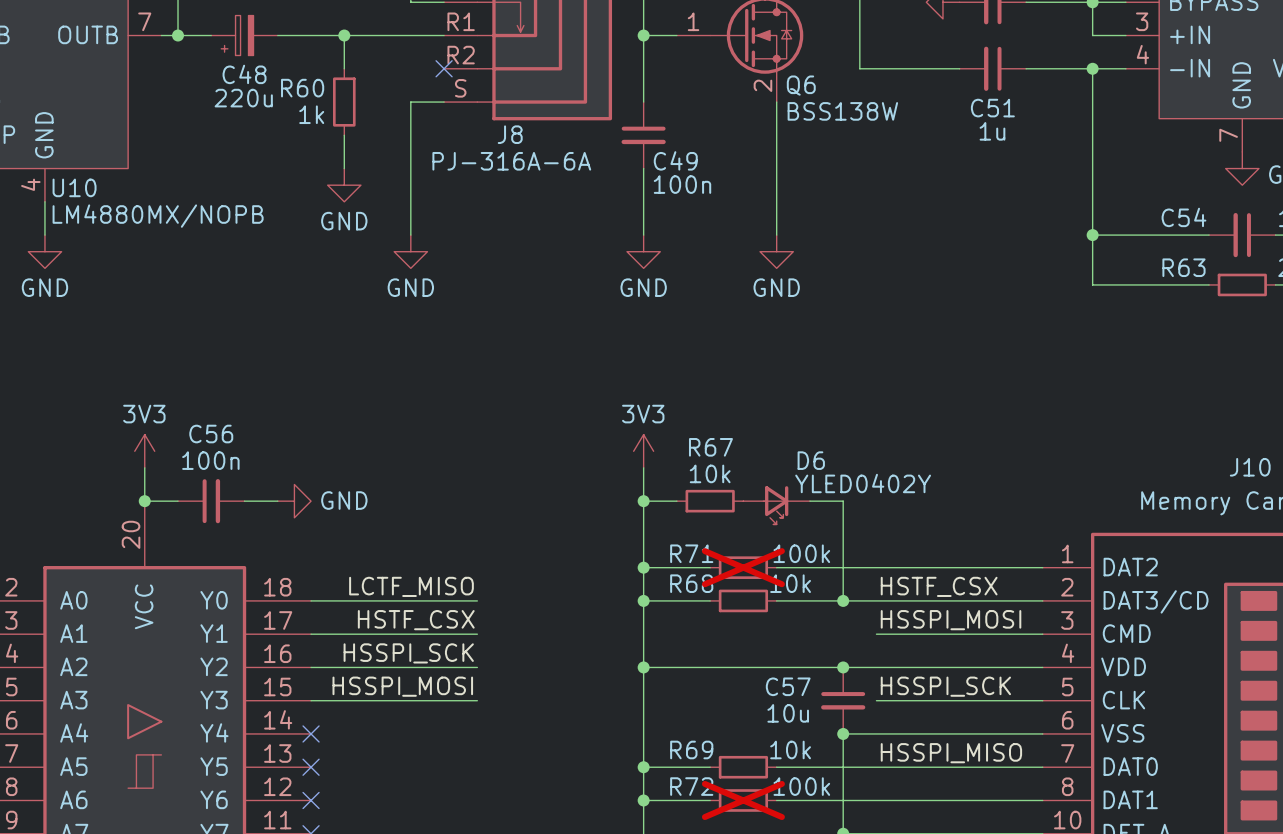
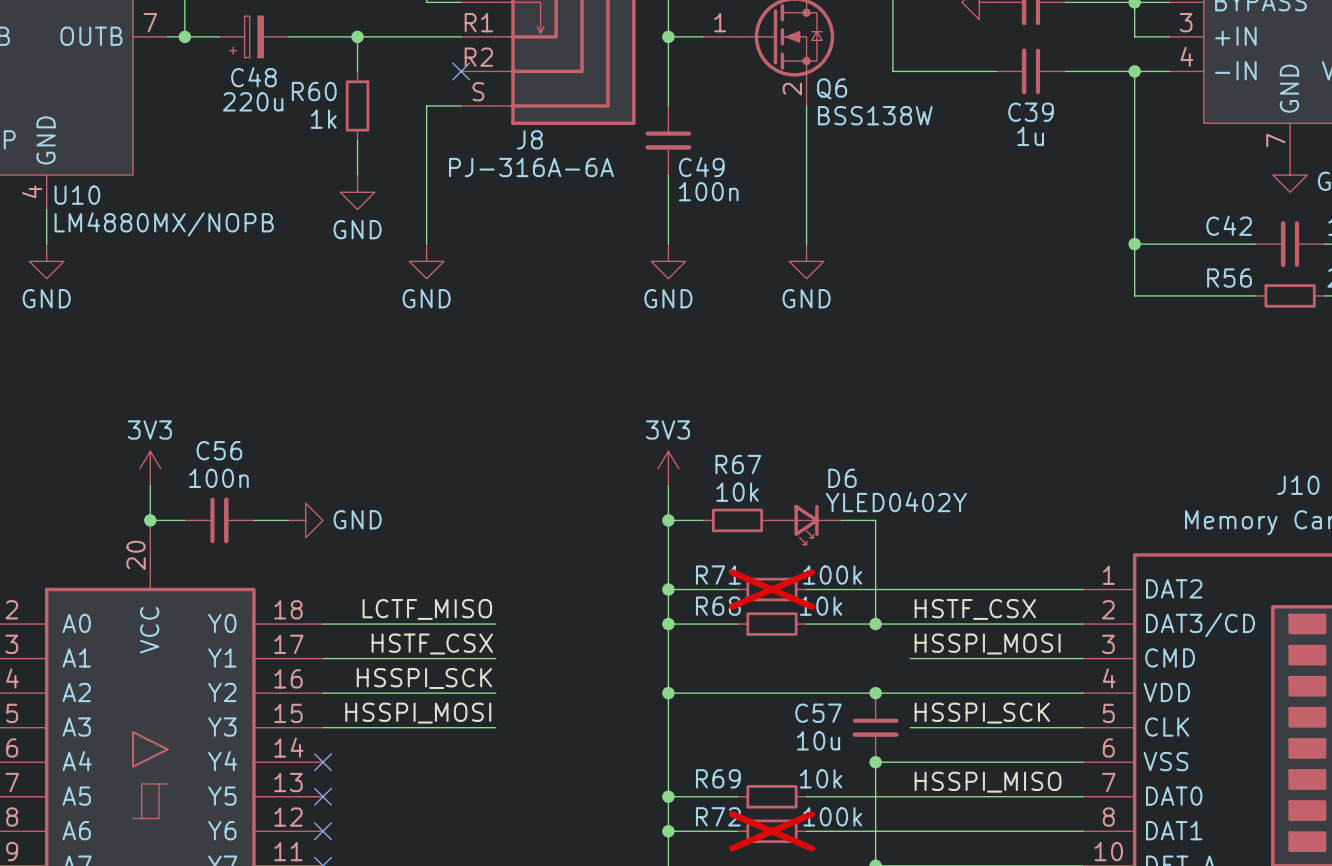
C51 name: C51 (992, 108) -> C39 (1031, 112)
C54 name: C54 (1183, 217) -> C42 (1229, 225)
R63 name: R63 (1183, 267) -> R56 (1229, 278)

